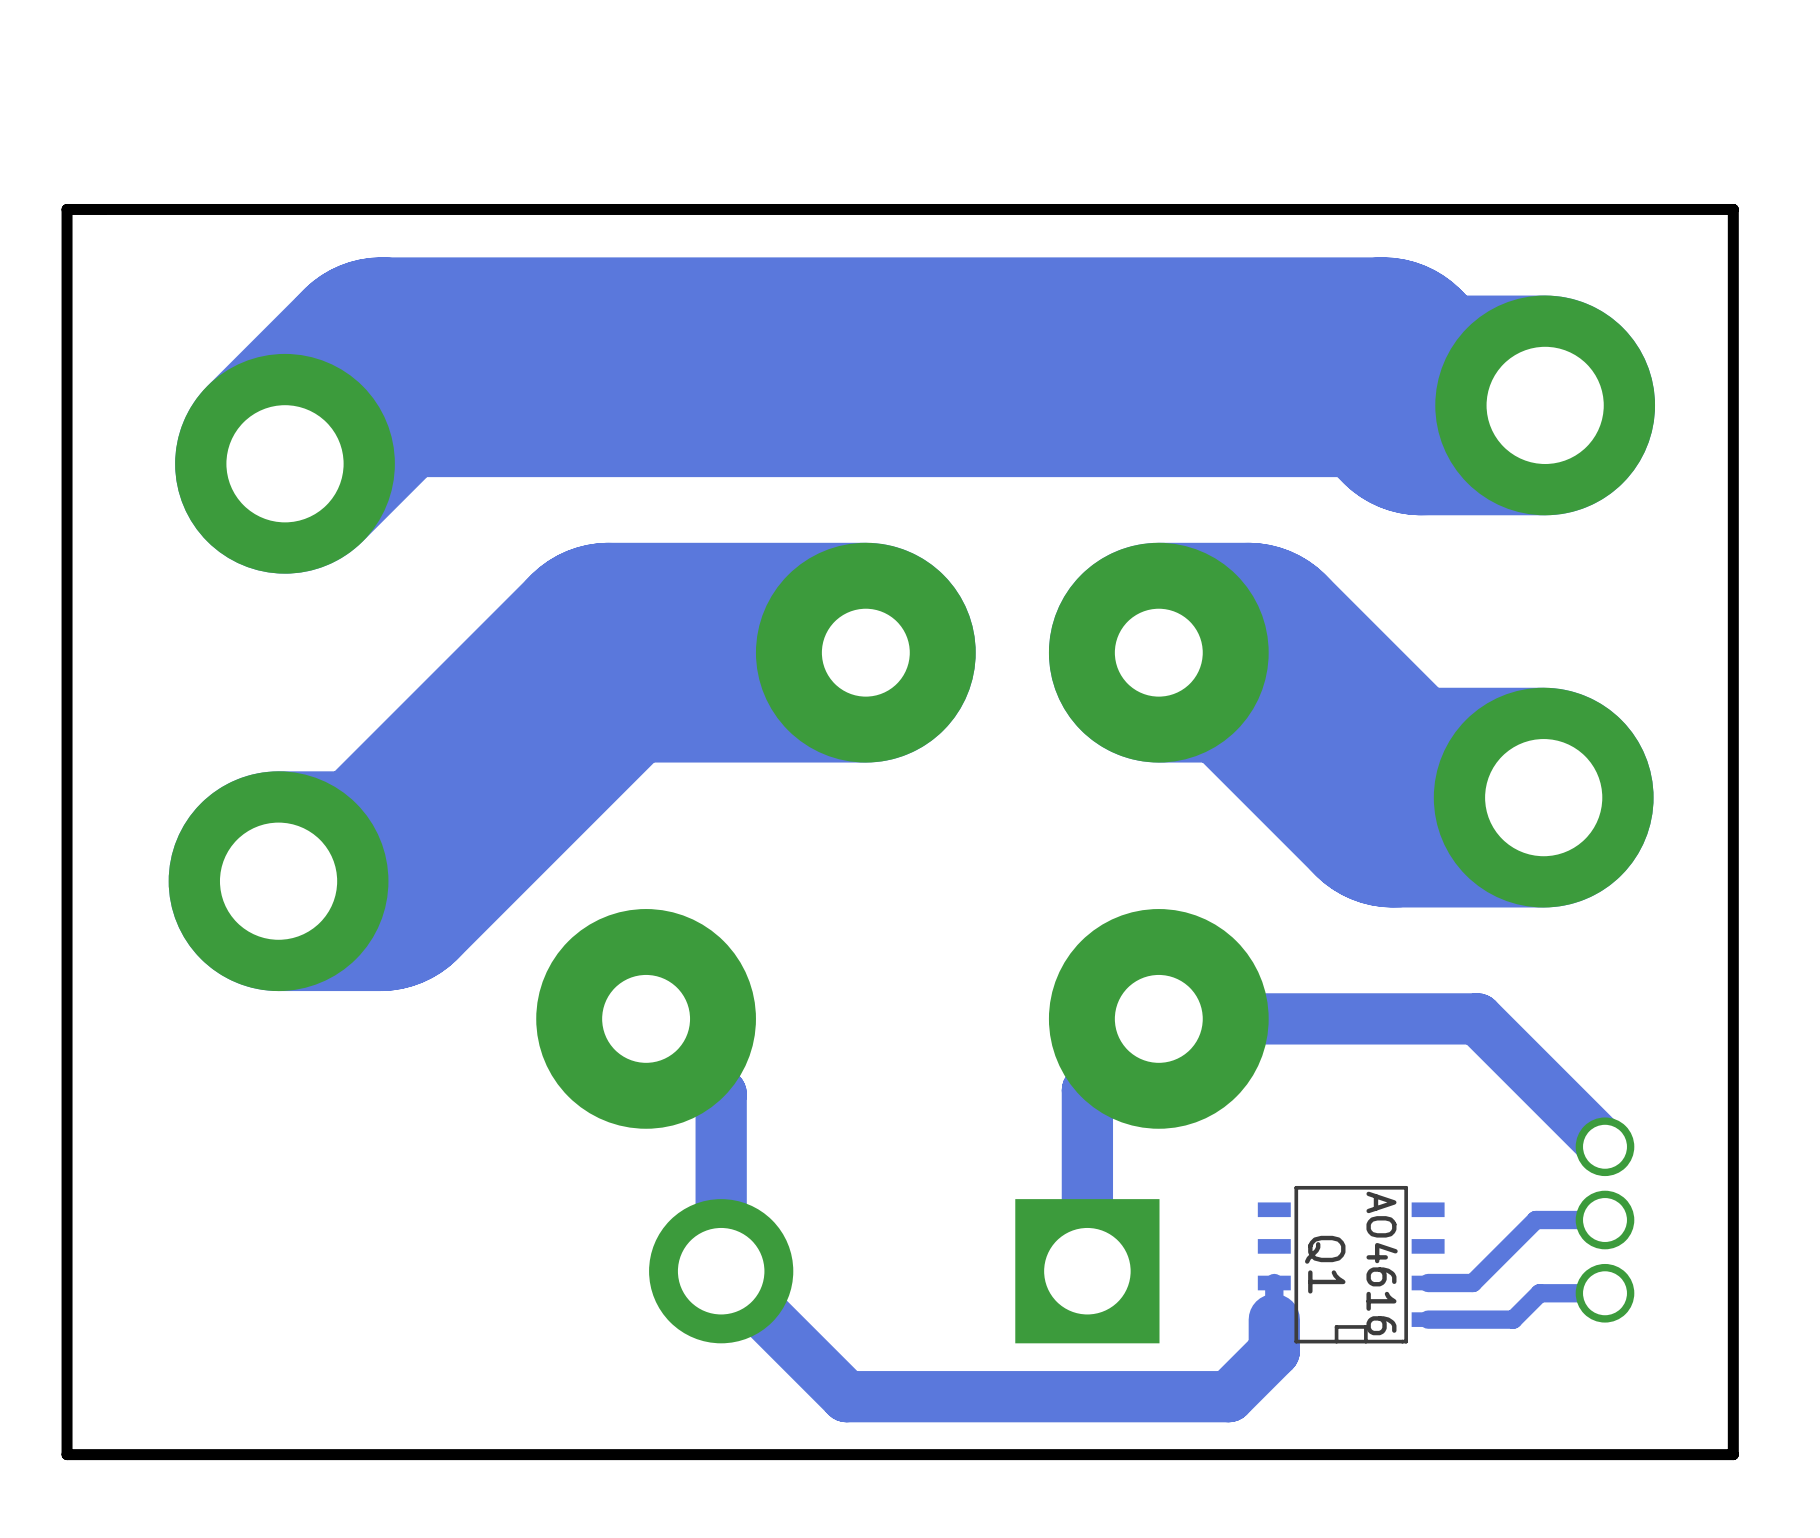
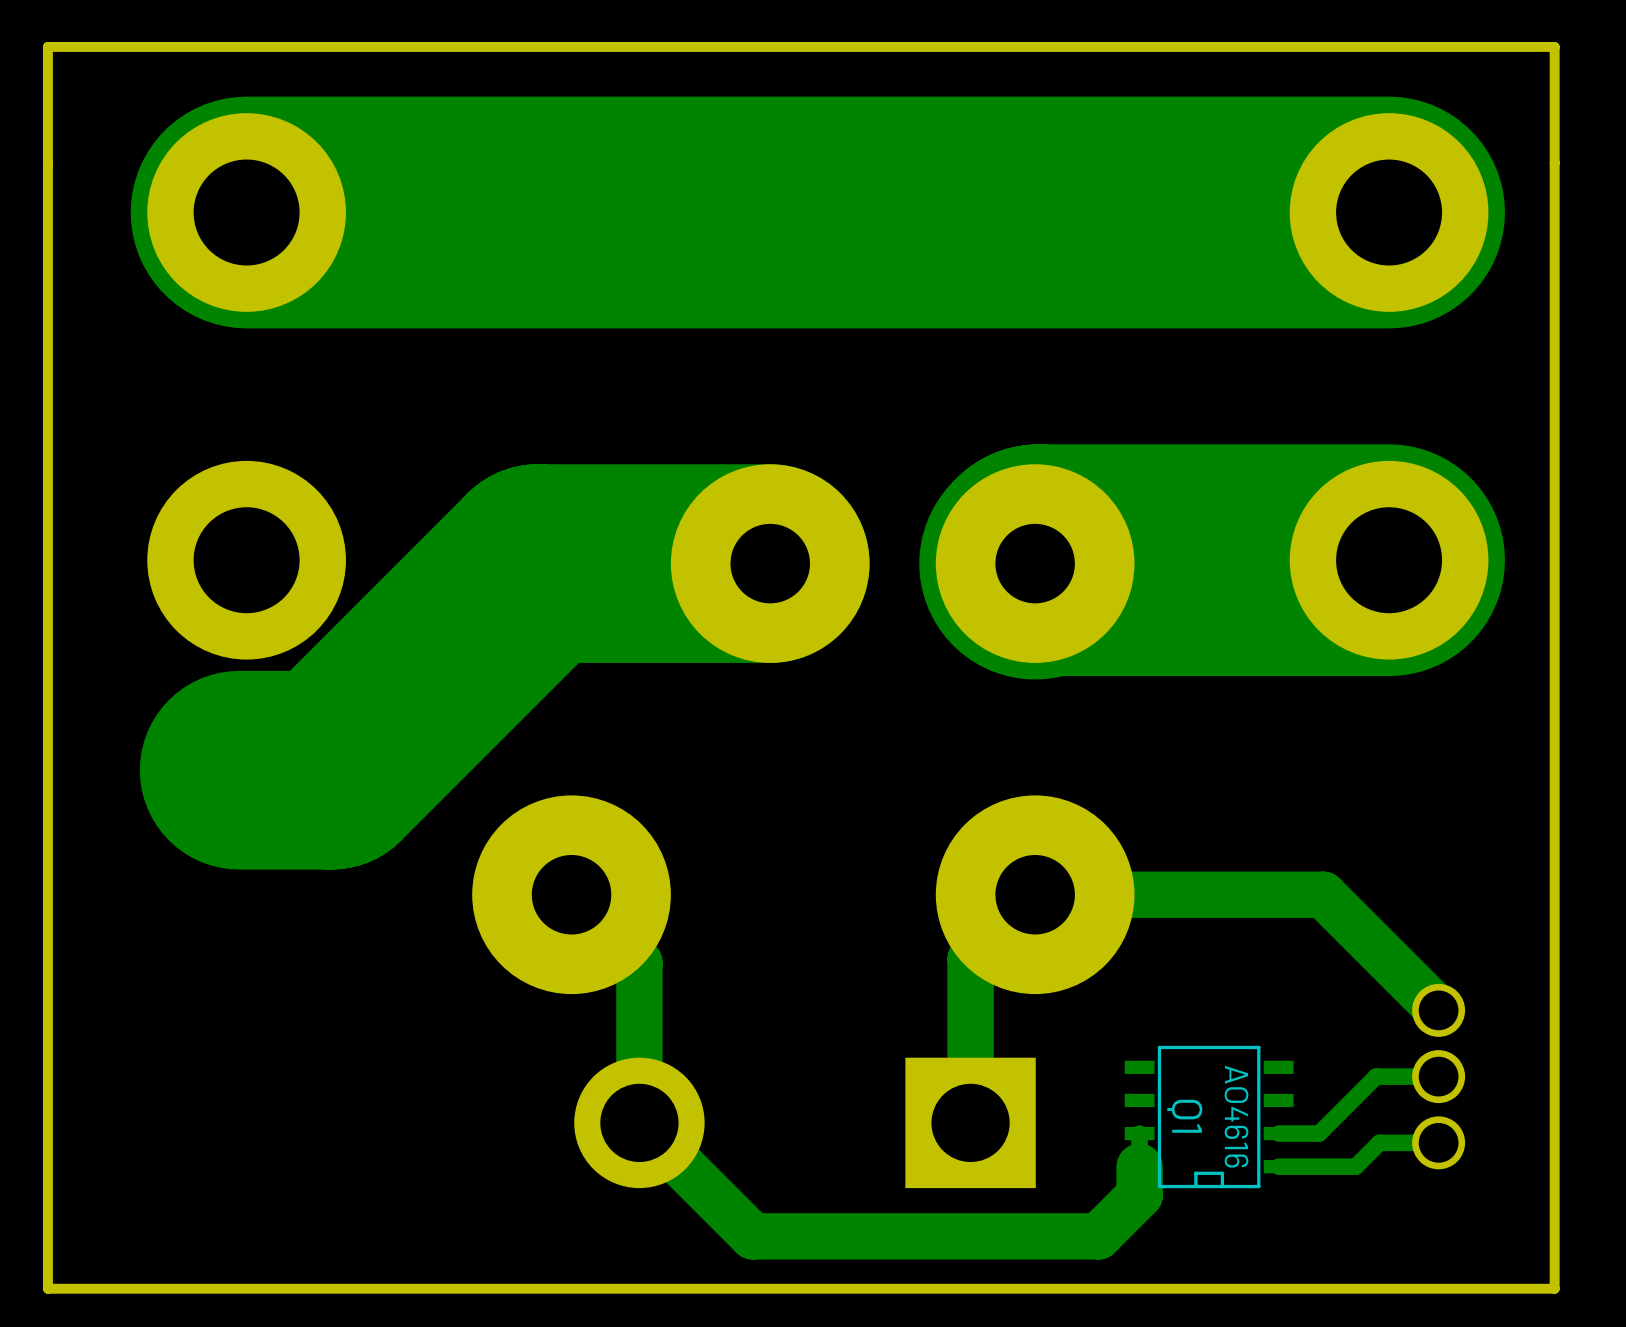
board edge: (1733, 209) (67, 209) -> (1554, 162) (1554, 46) (47, 46) (47, 162)
part: none -> (246, 212)
track: none -> (1389, 212) (246, 212)
part: none -> (1389, 212)
track: (1545, 405) (1421, 405) (1383, 367) (381, 367) (285, 463) -> none
part: (1545, 405) -> none
part: (285, 463) -> none
part: none -> (246, 560)
part: none -> (1389, 560)
track: (1158, 652) (1248, 652) (1393, 797) (1543, 797) -> (1035, 563) (1038, 560) (1389, 560)
part: (1543, 797) -> none
part: (278, 881) -> none

